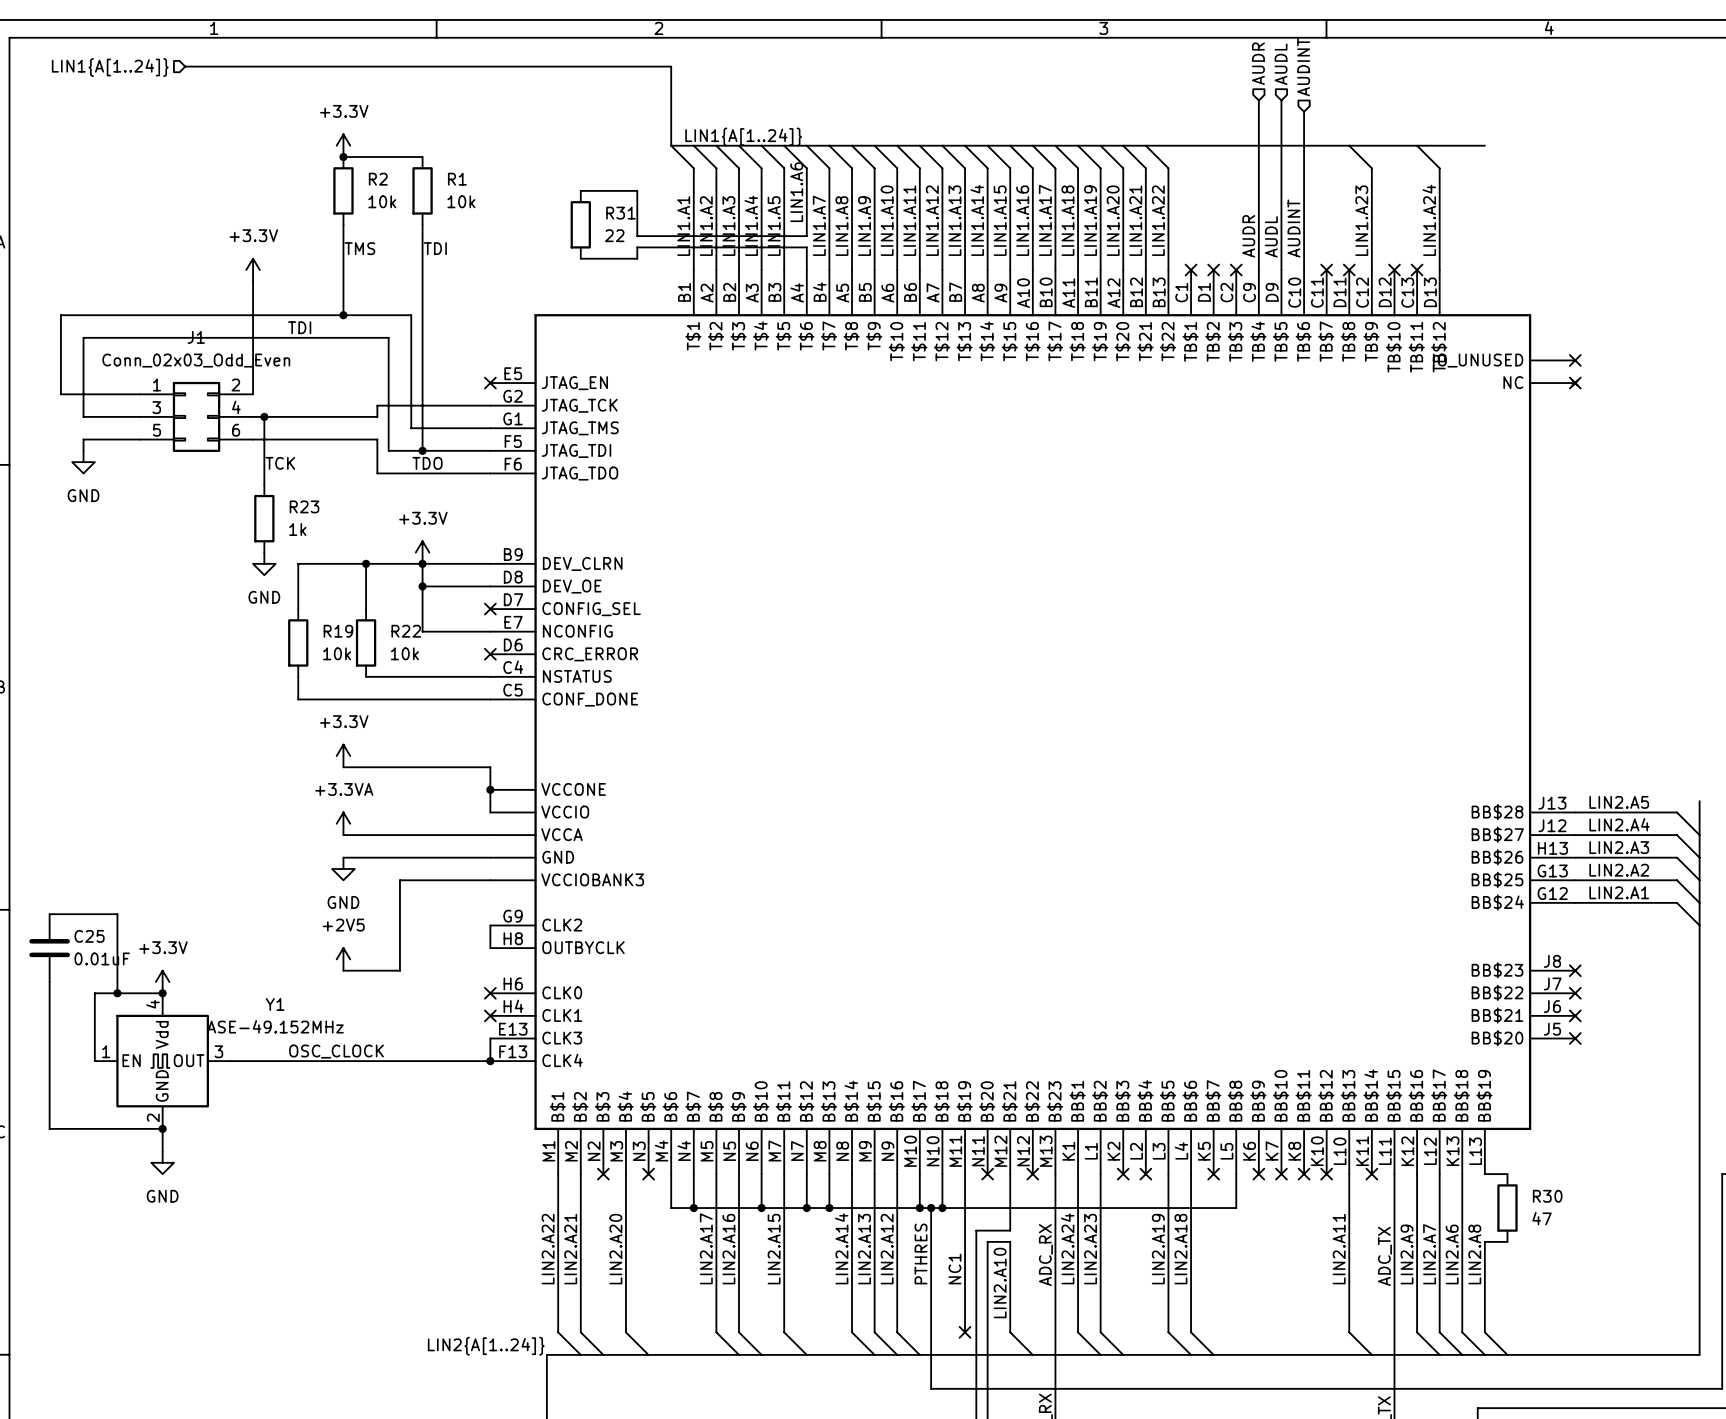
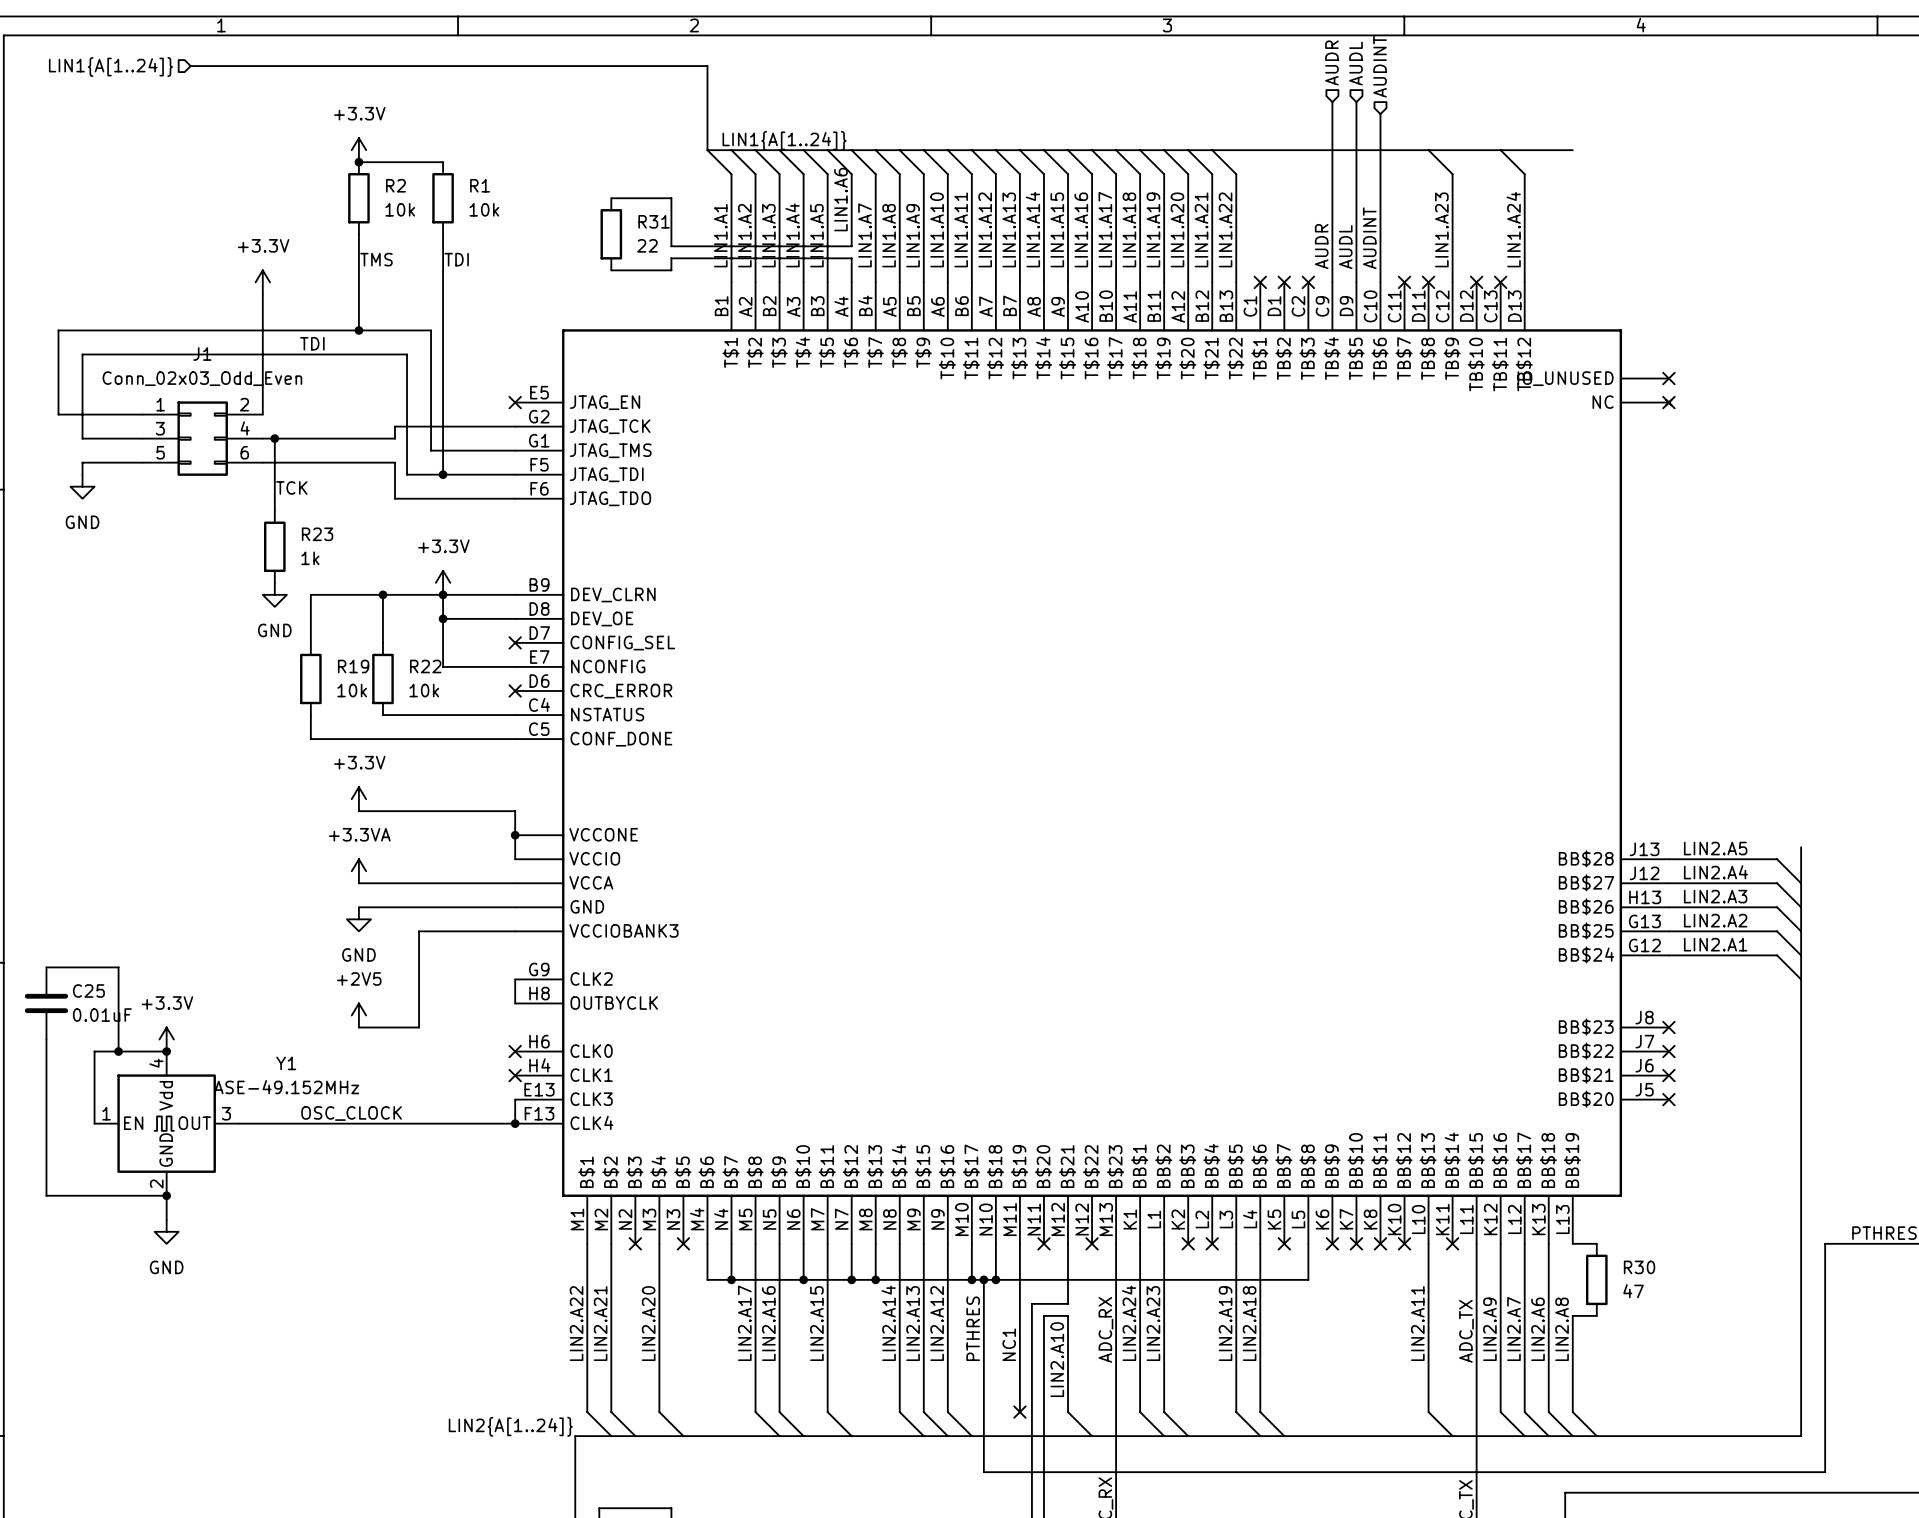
label: TDO (427, 463) -> none

